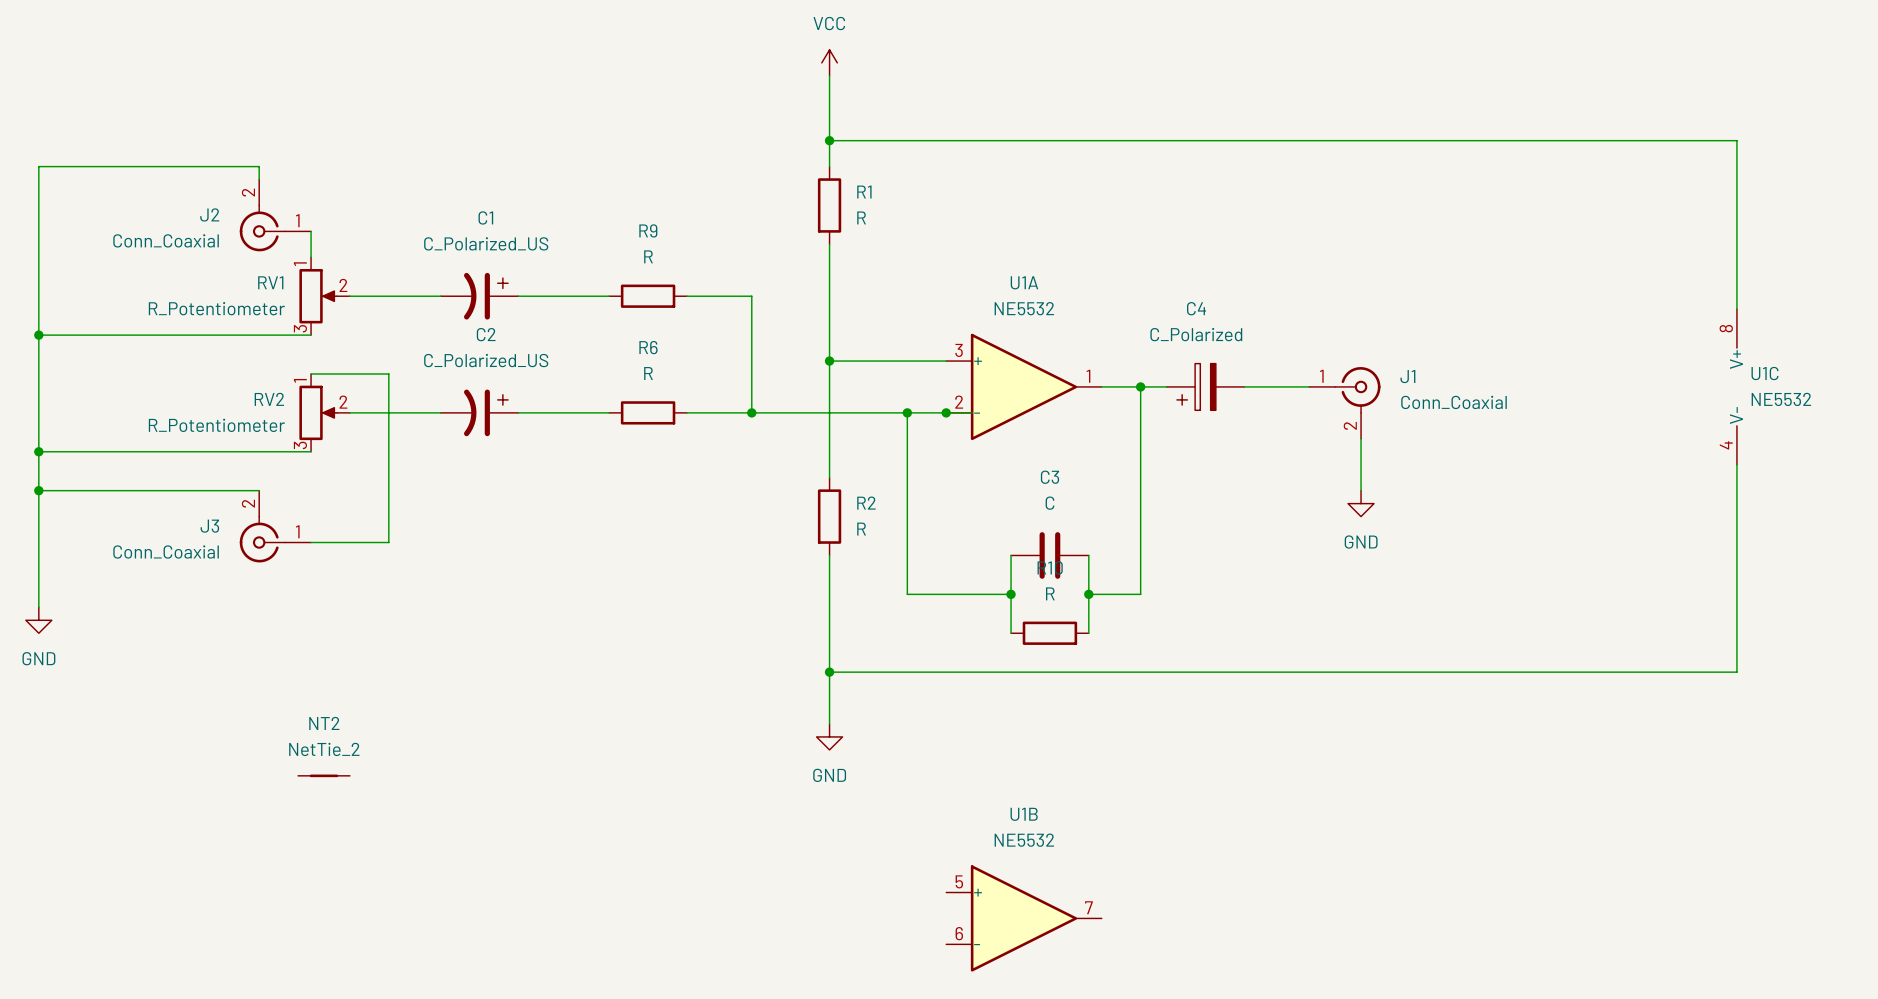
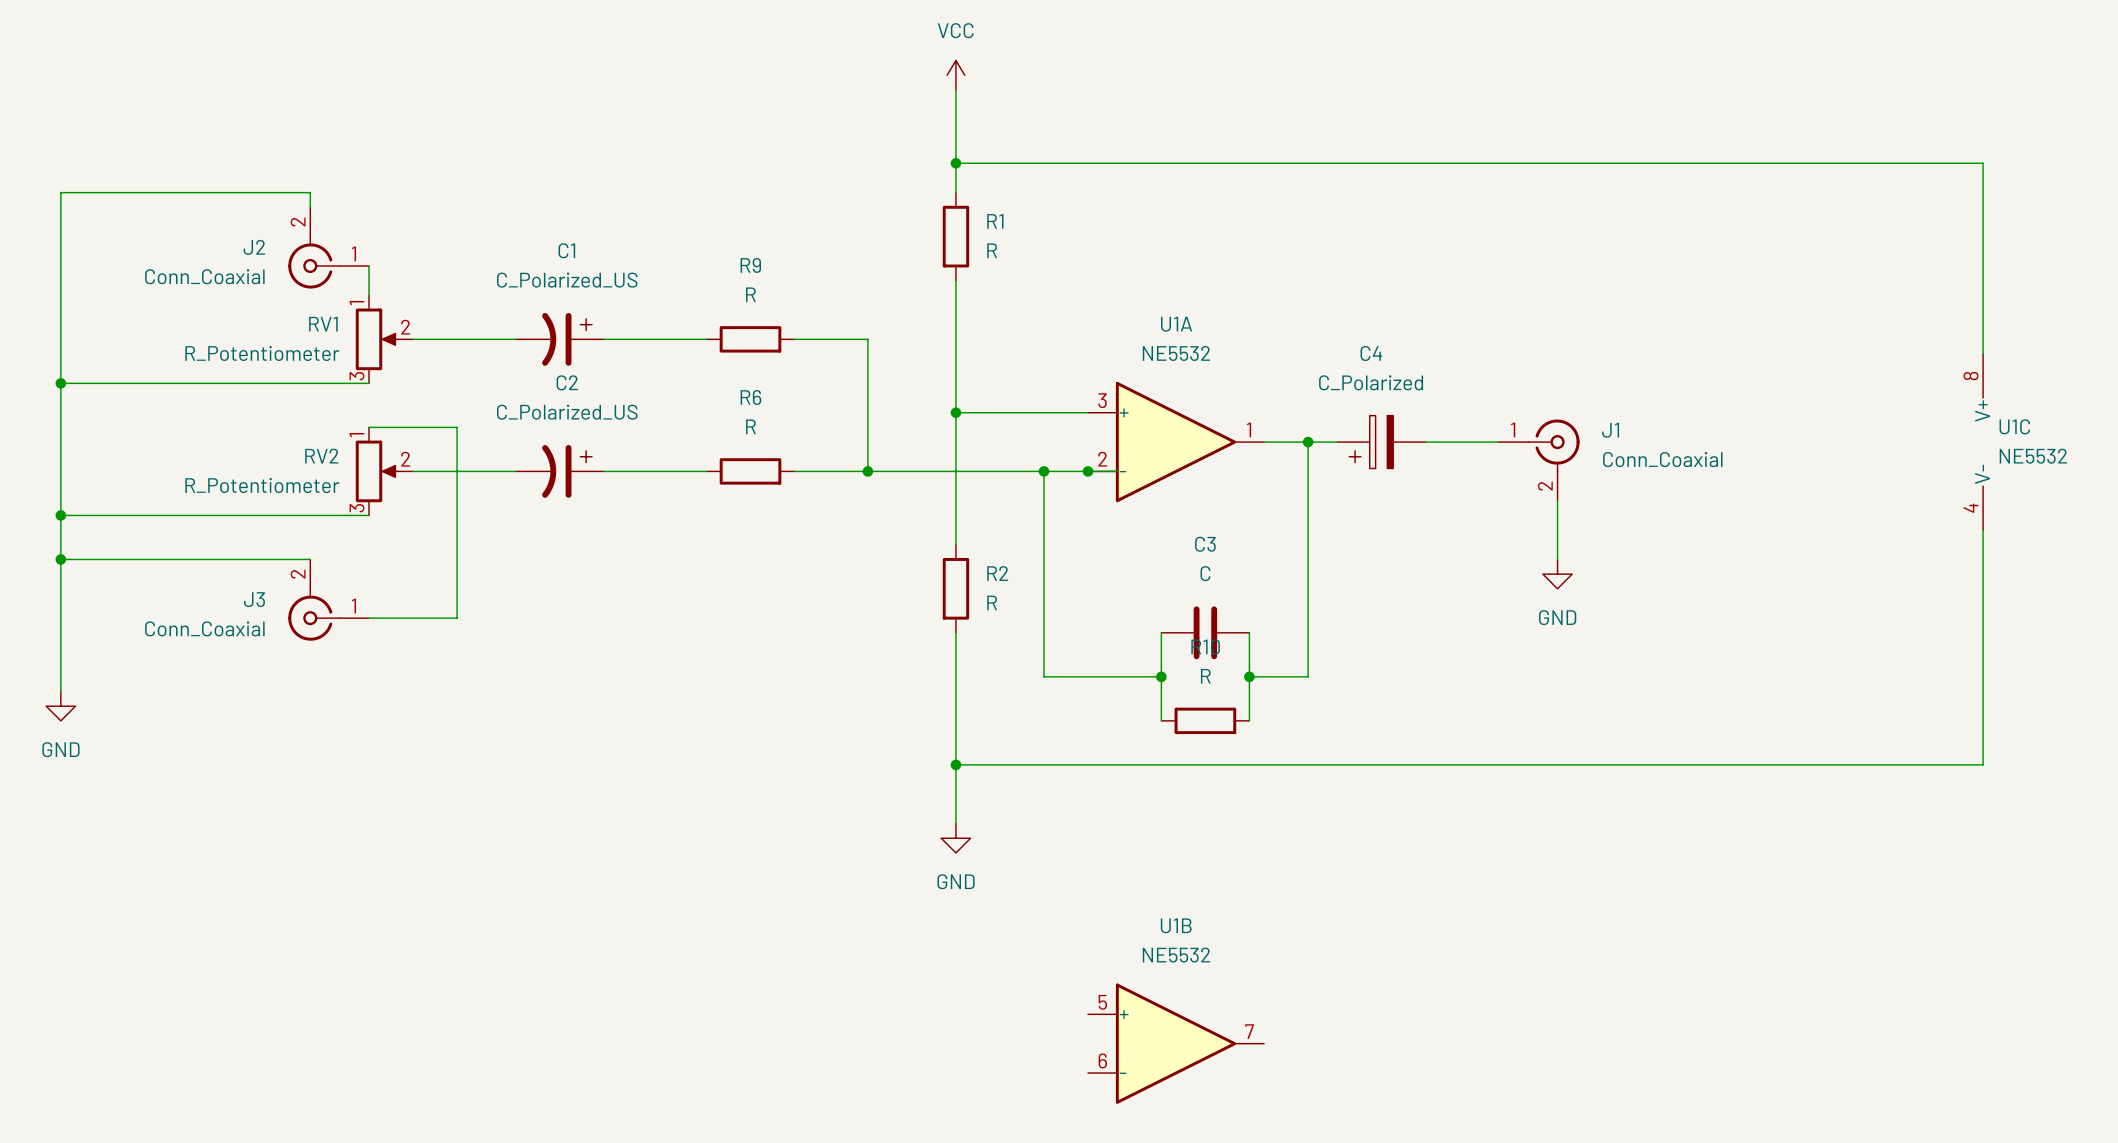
NT2: NetTie_2 (324, 775) -> none

